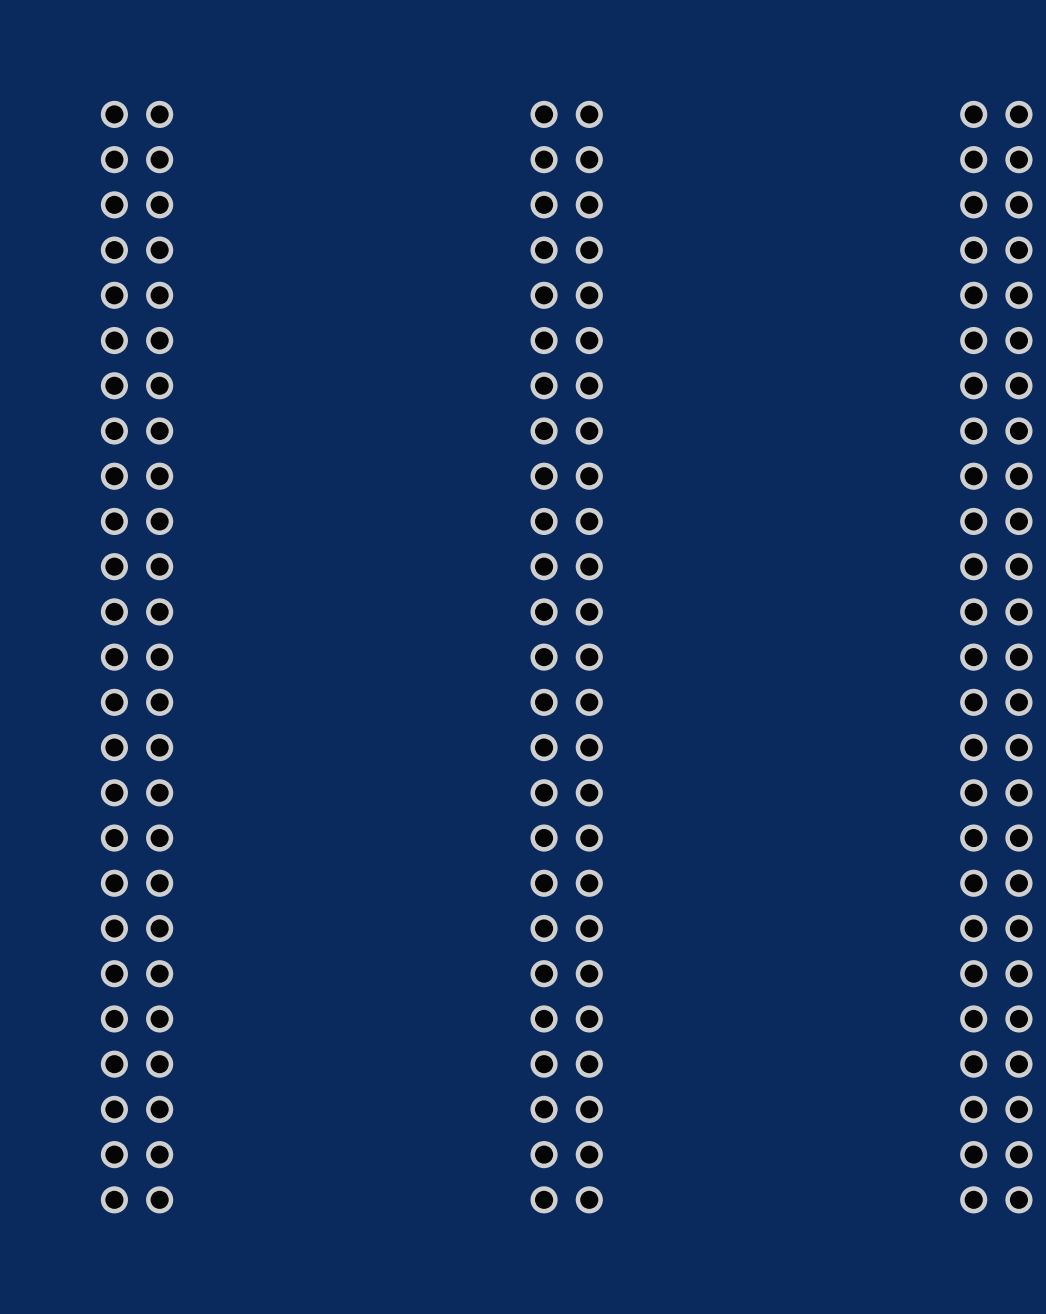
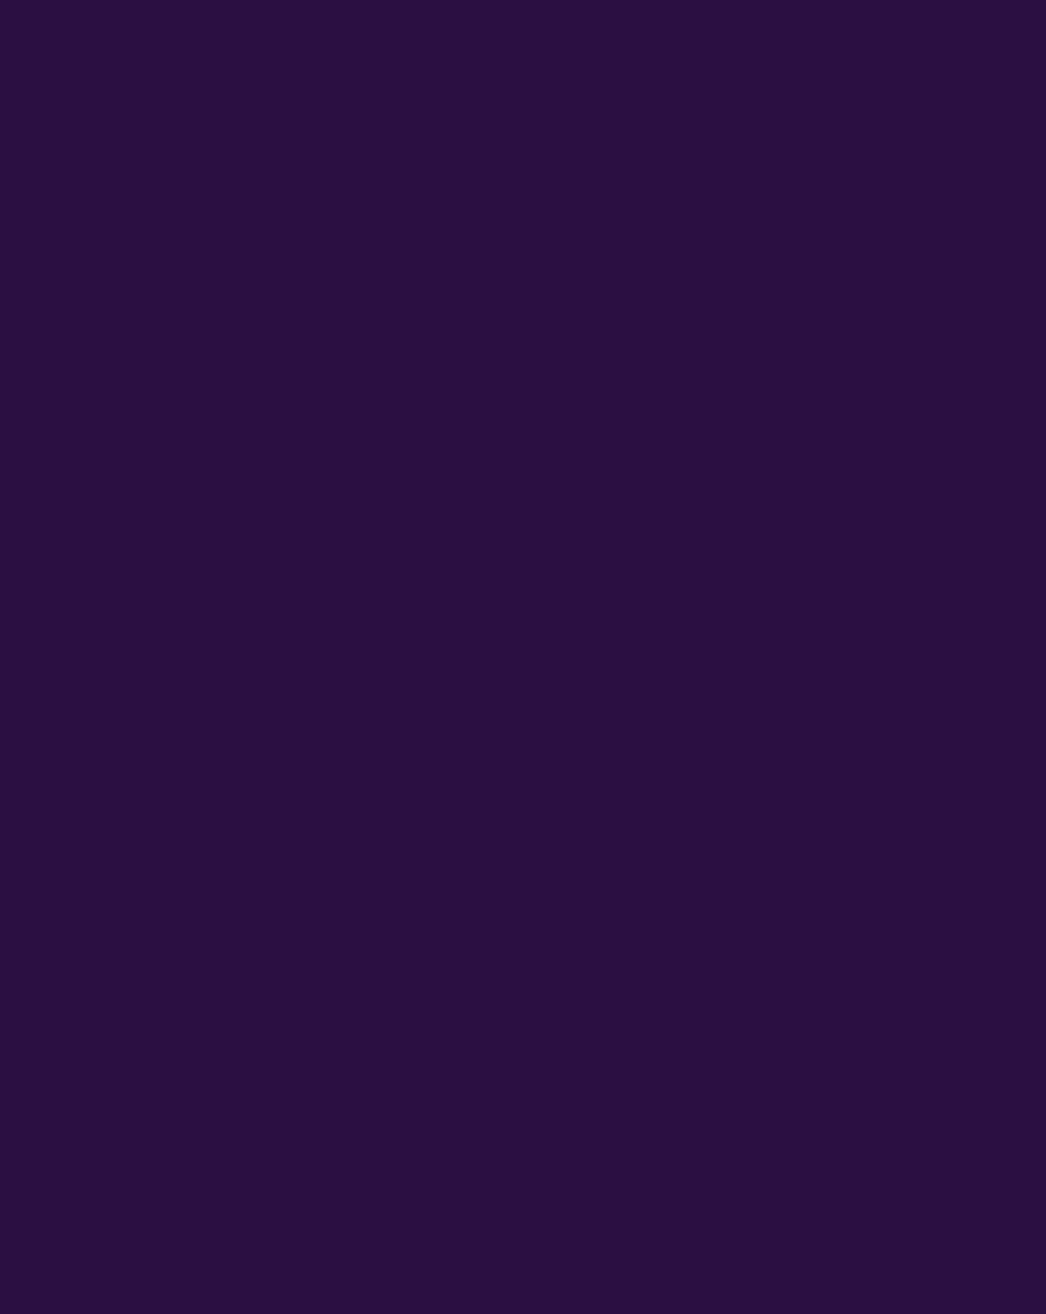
part: (137, 657) -> none
part: (566, 657) -> none
part: (996, 657) -> none

